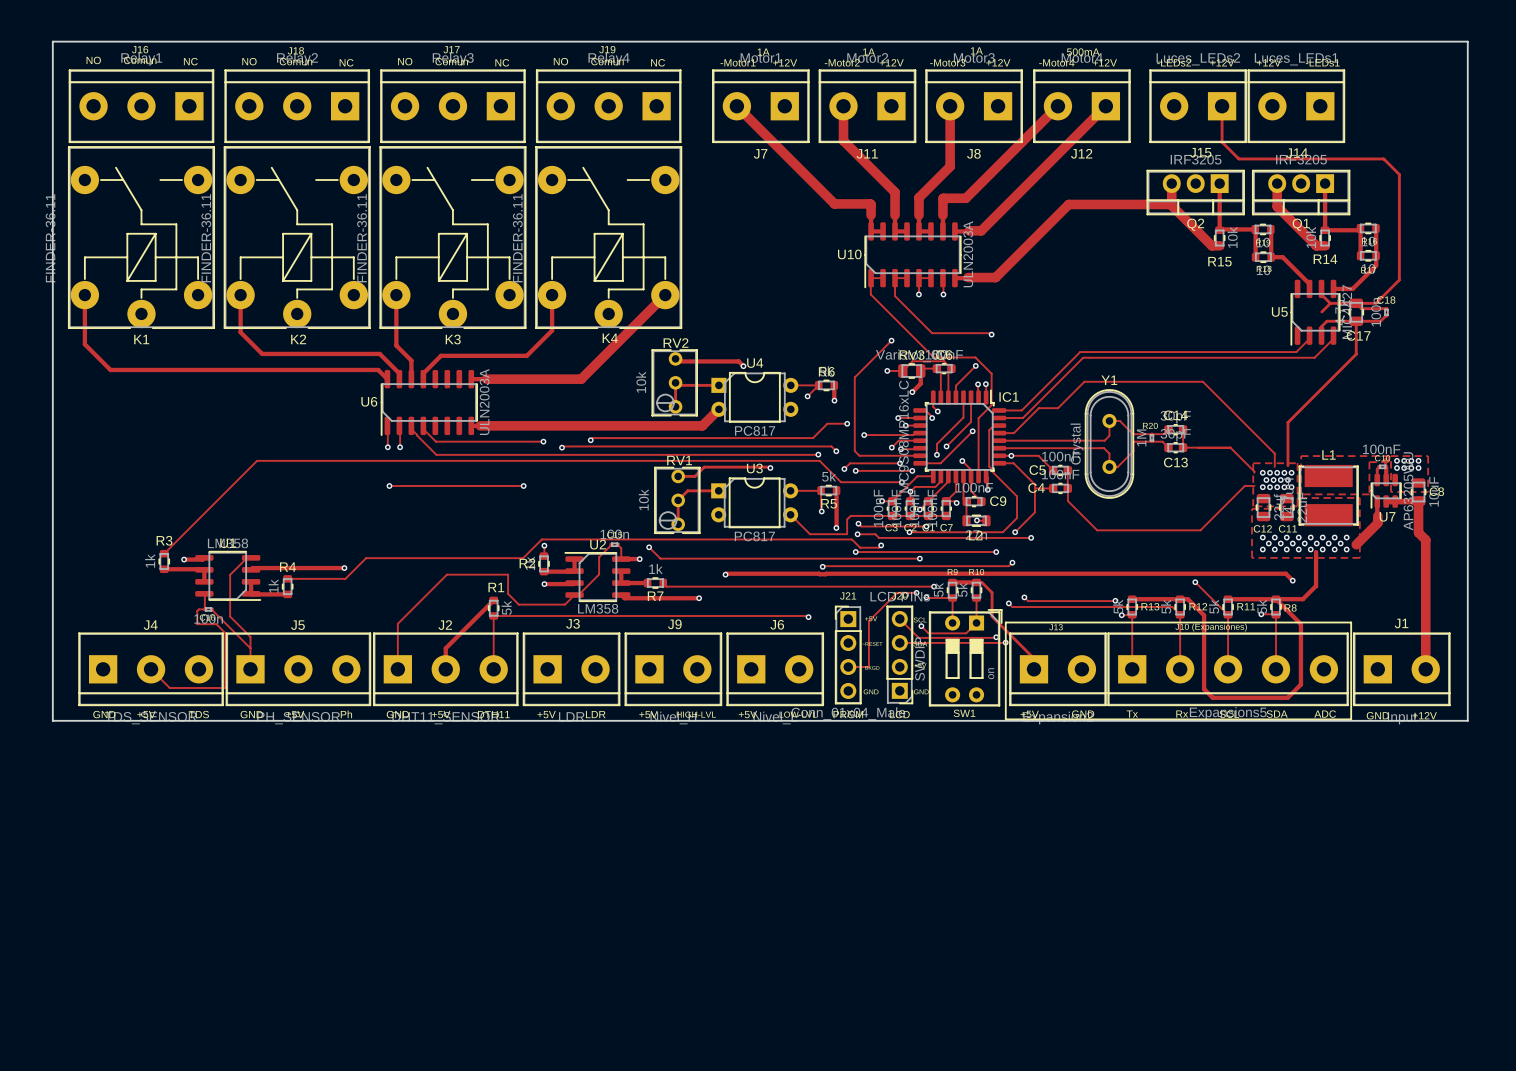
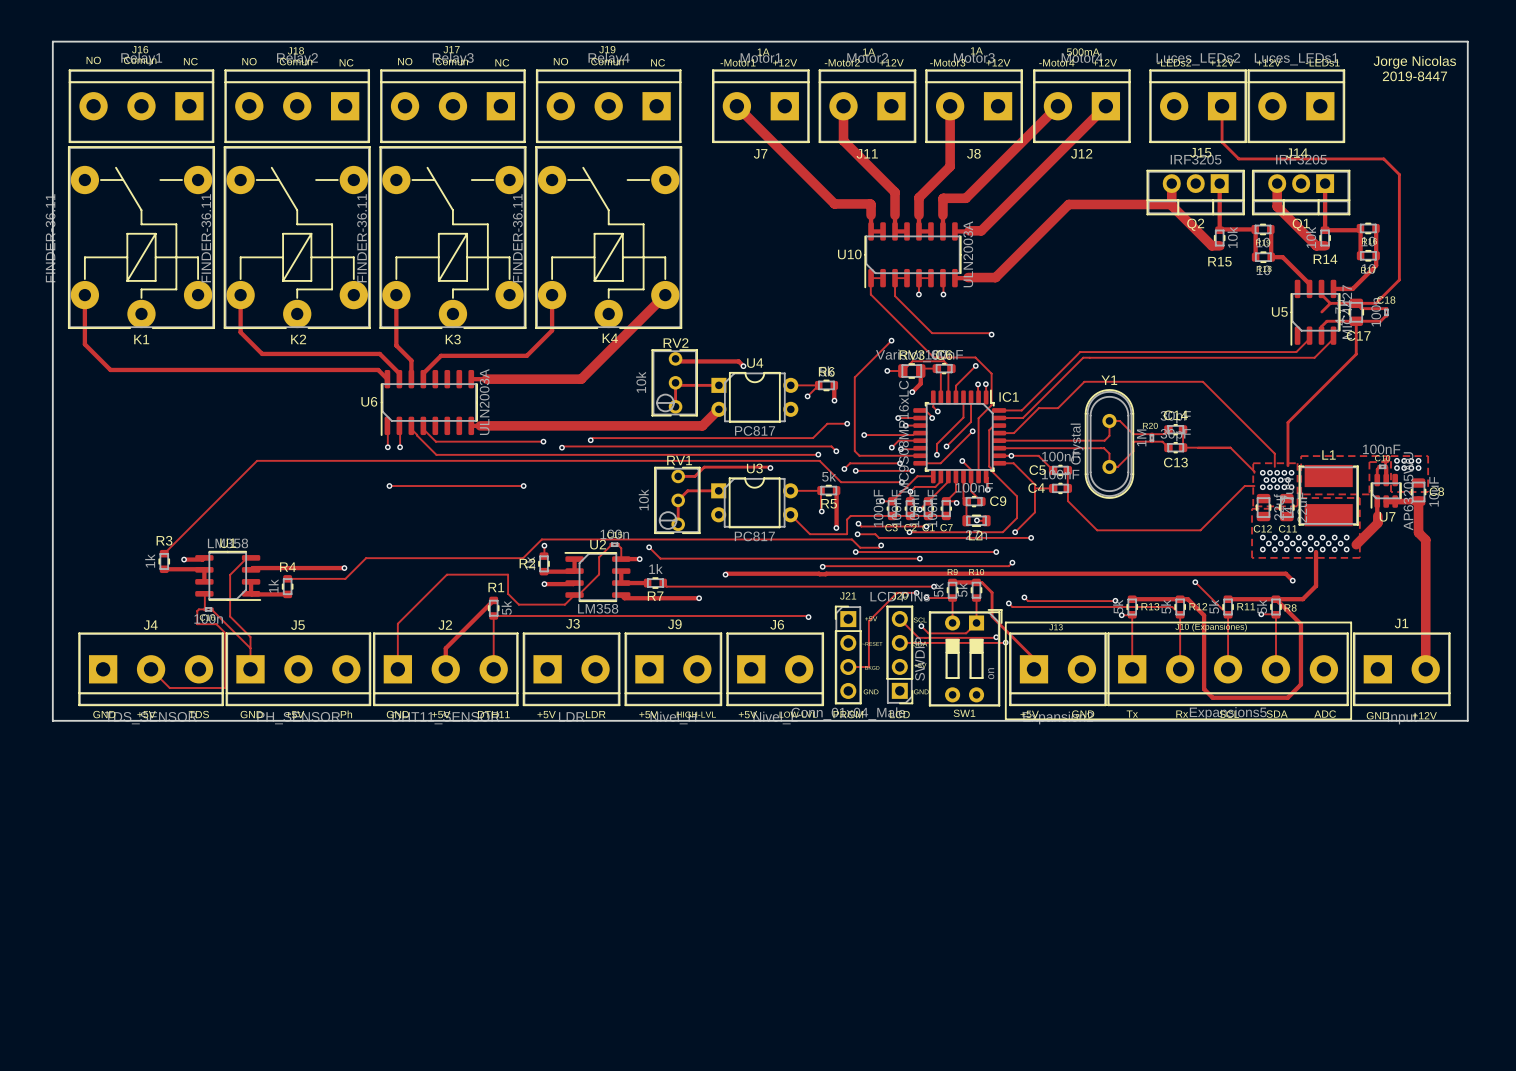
text: none -> Jorge Nicolas (1414, 62)
text: none -> 2019-8447 (1414, 76)

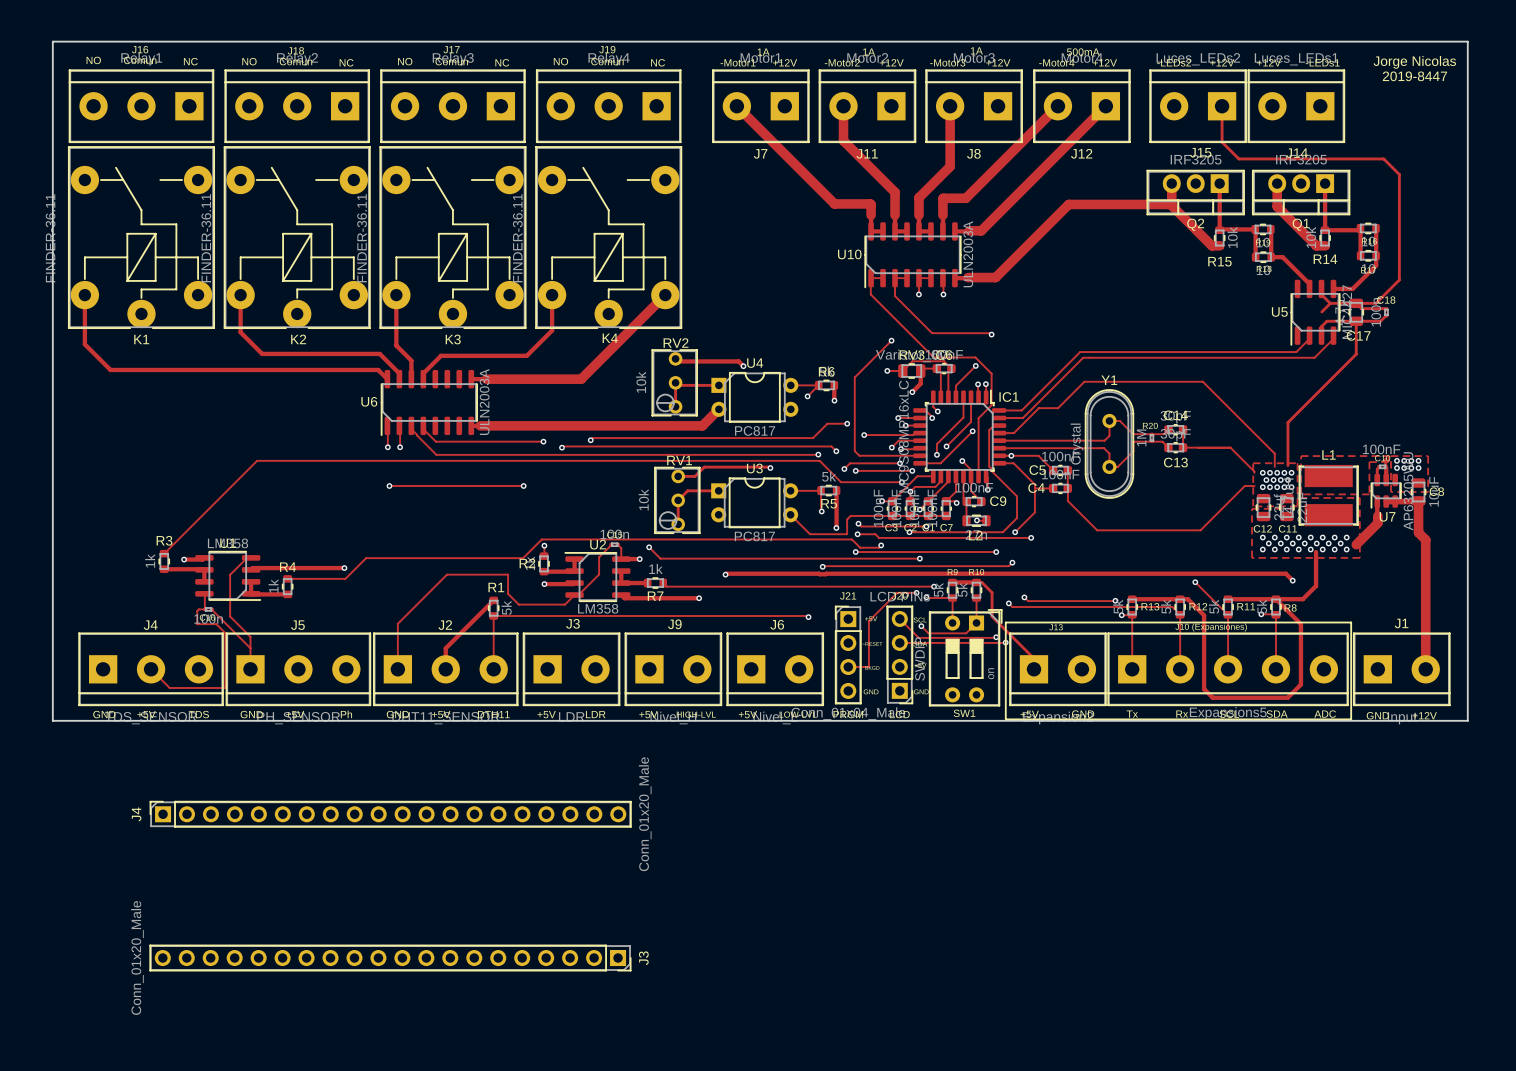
J4: none -> Conn_01x20_Male (390, 814)
J3: none -> Conn_01x20_Male (390, 958)

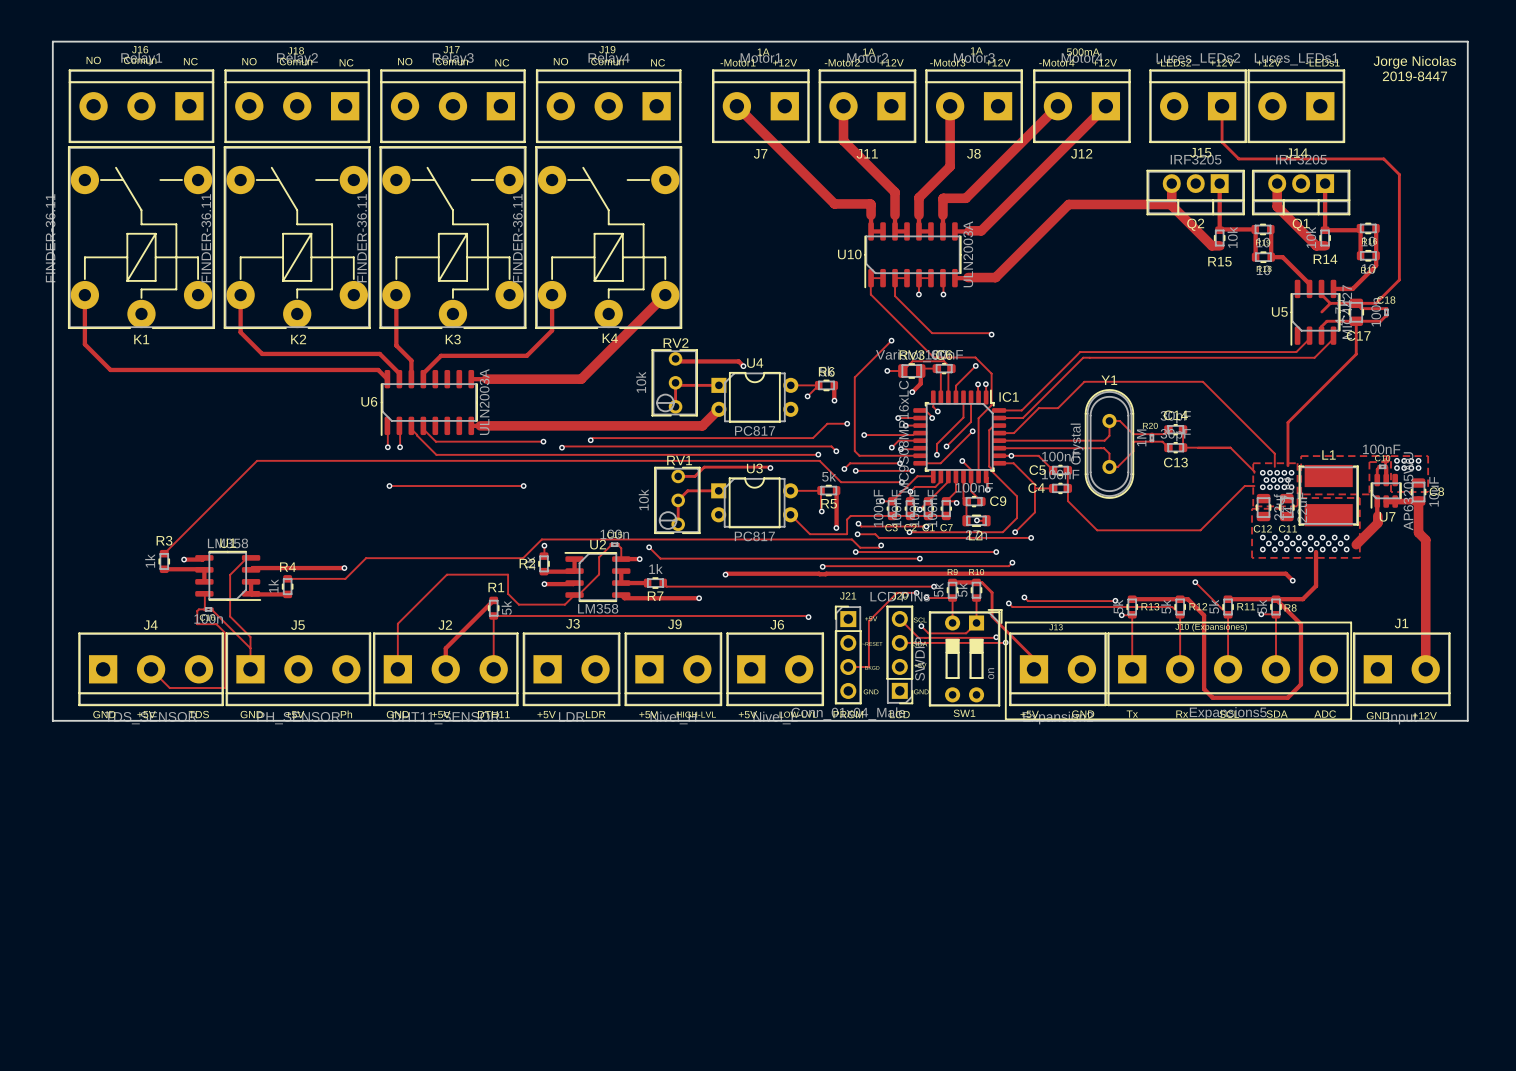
J4: Conn_01x20_Male (390, 814) -> none
J3: Conn_01x20_Male (390, 958) -> none

